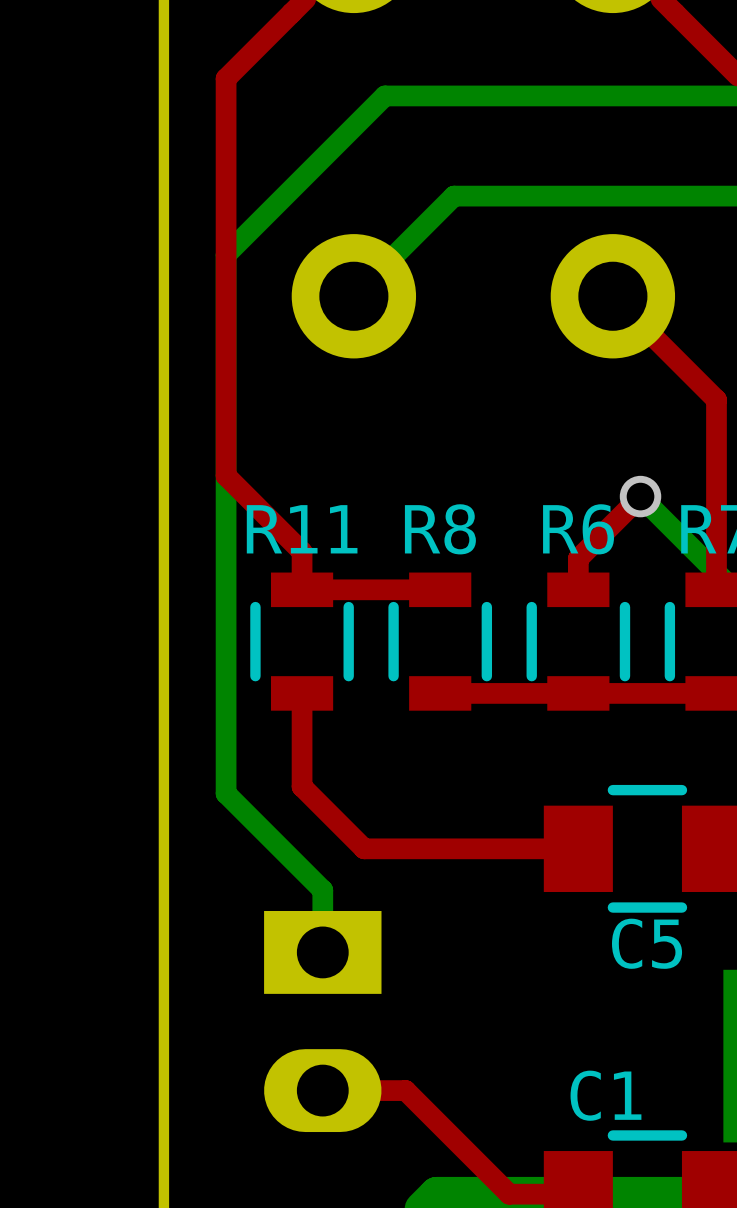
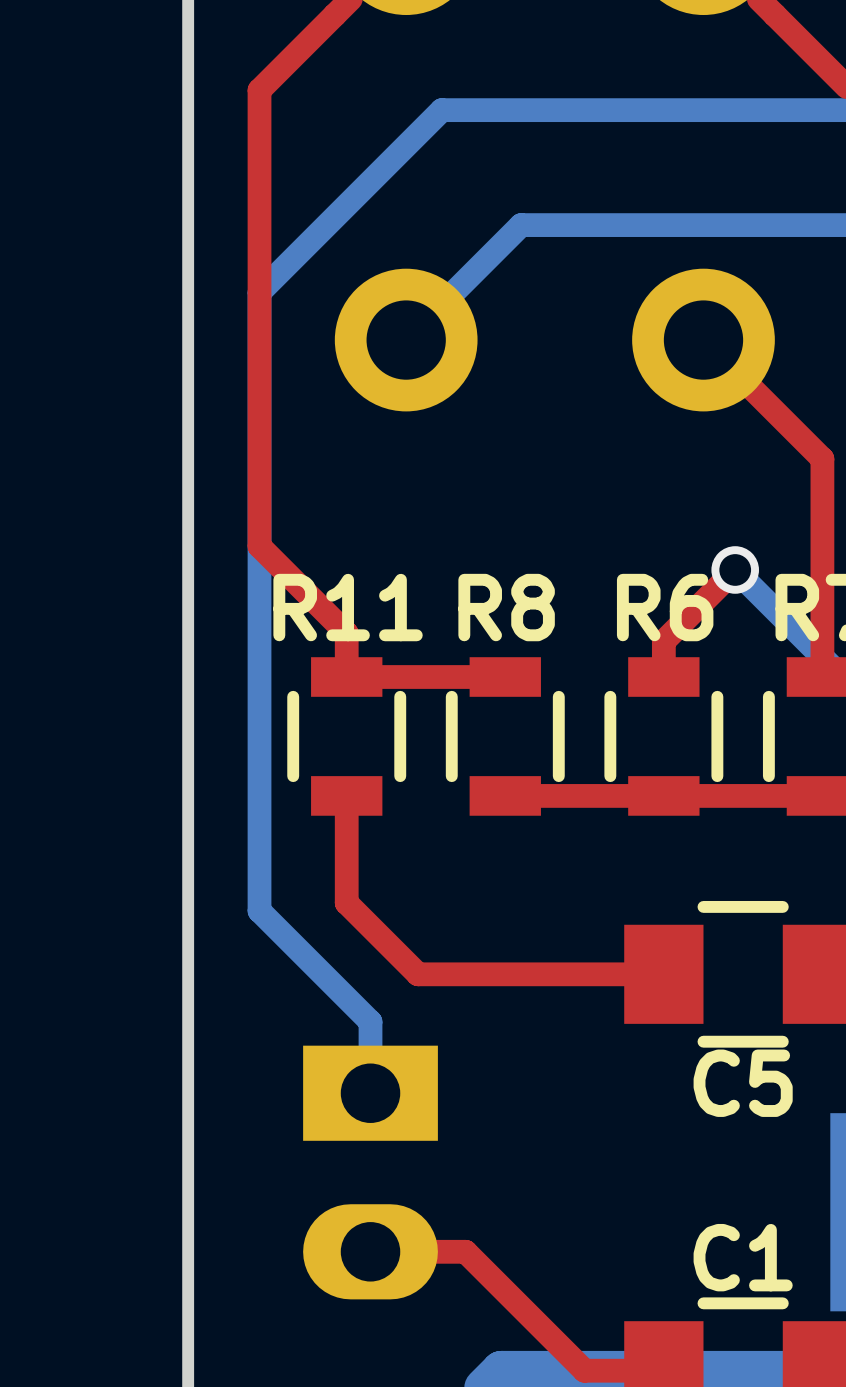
C1 name position: C1 (605, 1095) -> C1 (743, 1257)

